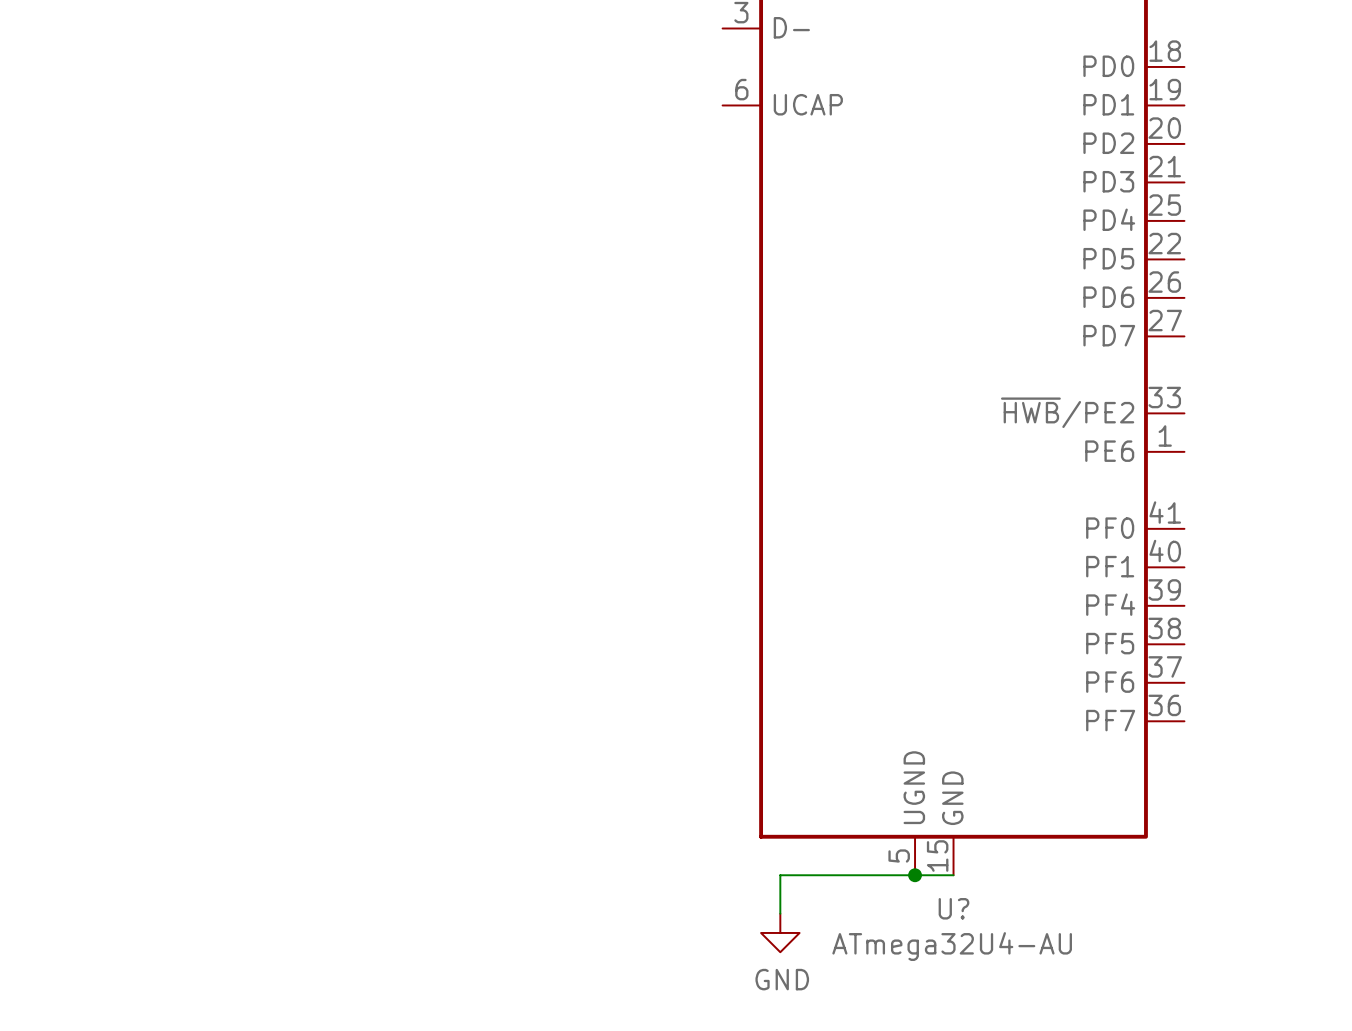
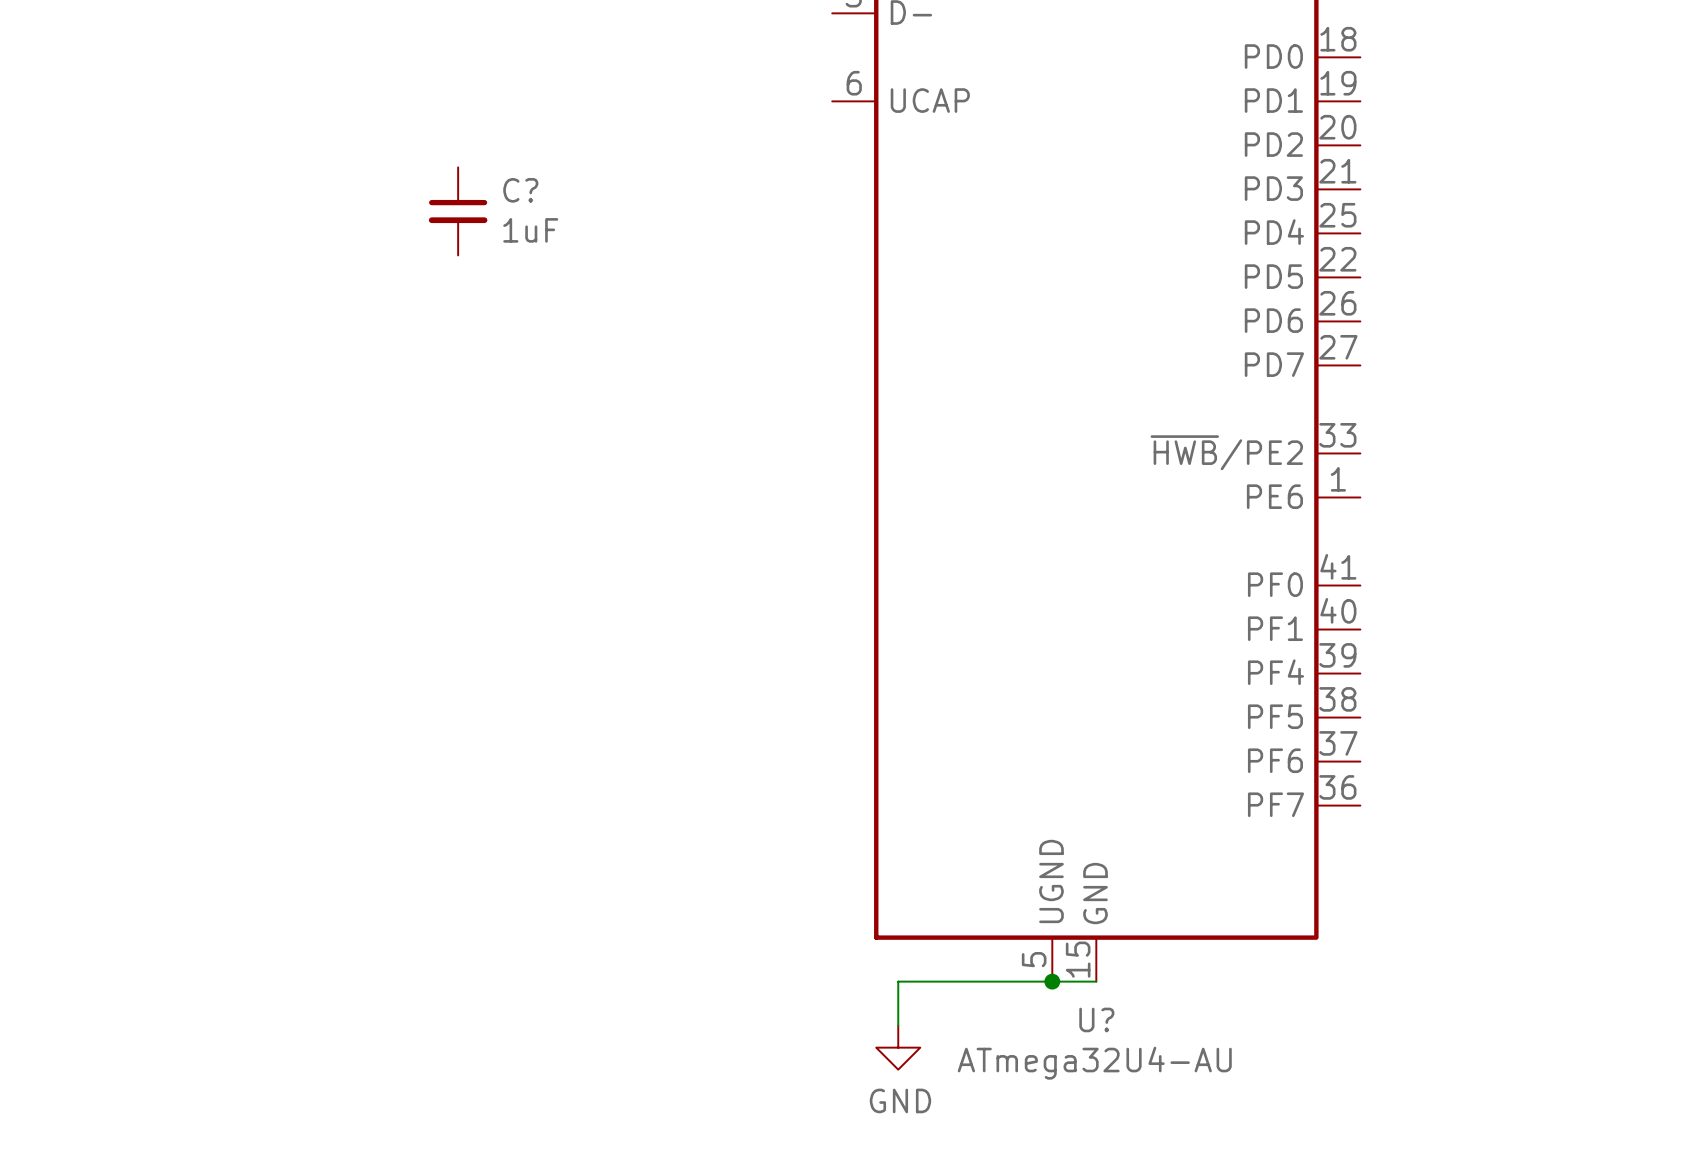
C?: none -> 1uF (458, 211)

